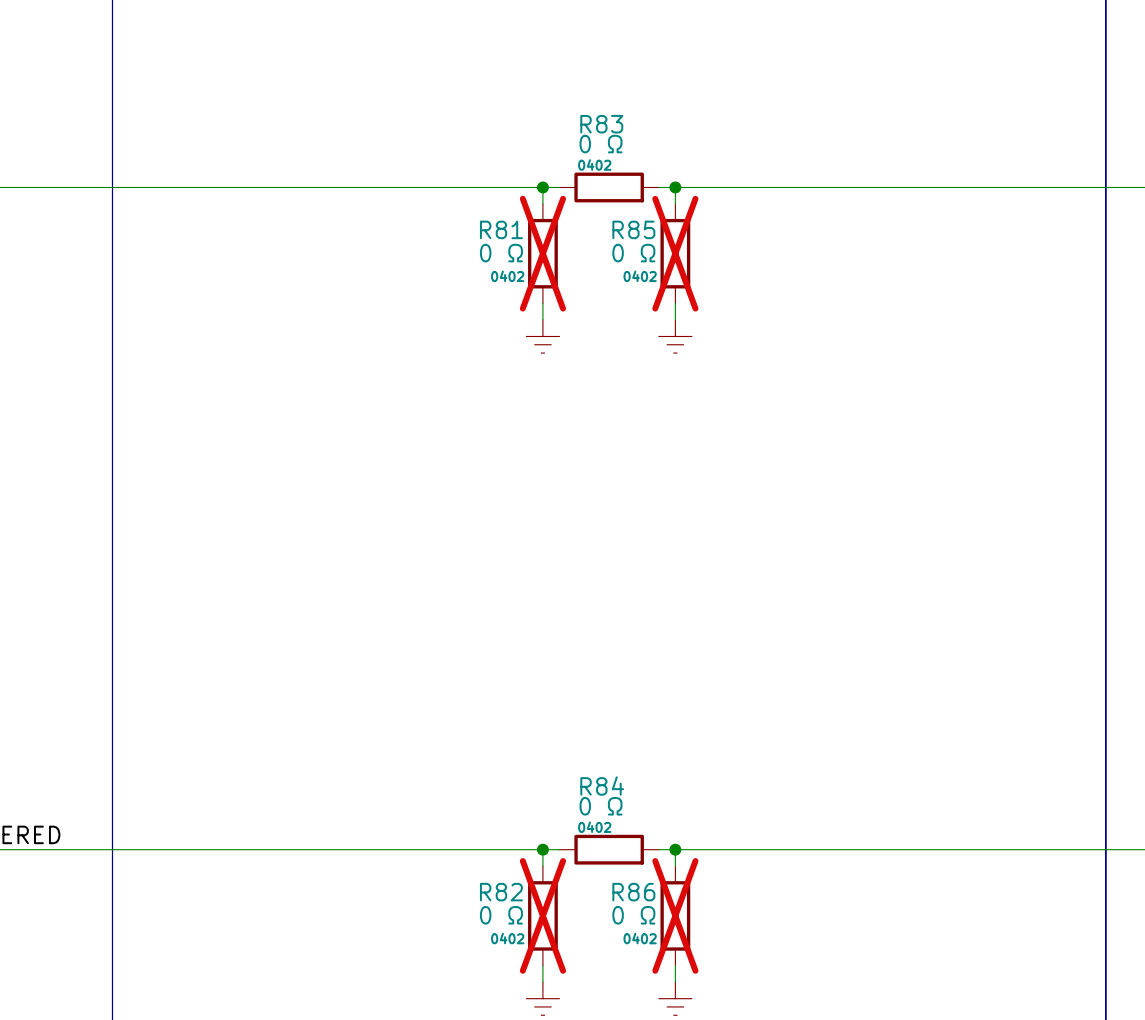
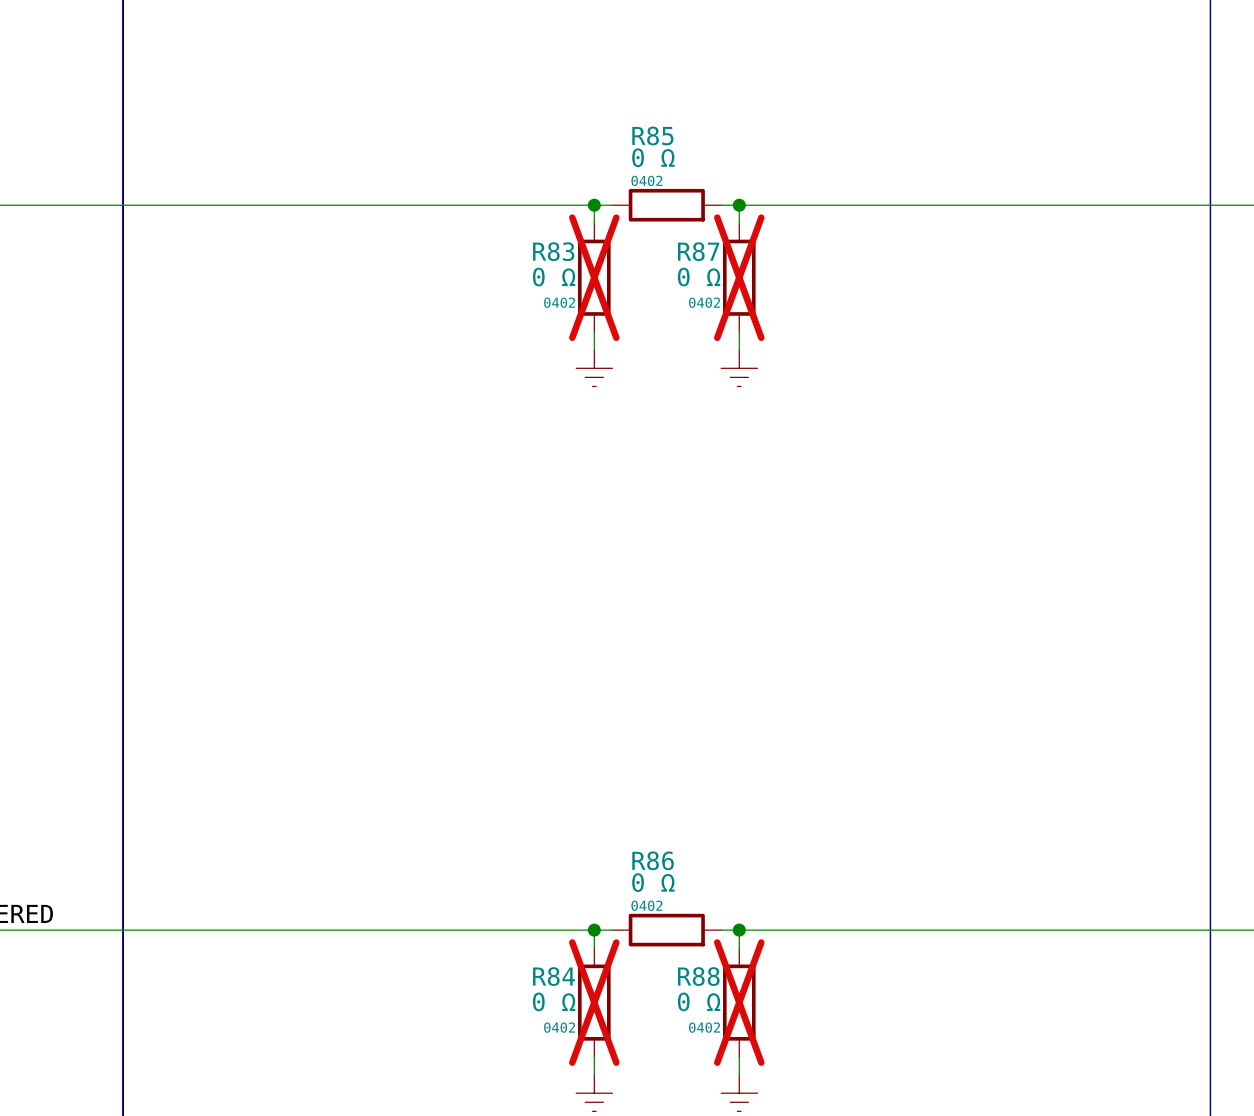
R83 name: R83 (601, 124) -> R85 (652, 135)
R81 name: R81 (501, 229) -> R83 (553, 251)
R85 name: R85 (633, 229) -> R87 (698, 251)
R84 name: R84 (602, 786) -> R86 (653, 860)
R82 name: R82 (501, 892) -> R84 (554, 976)
R86 name: R86 (633, 892) -> R88 (698, 976)

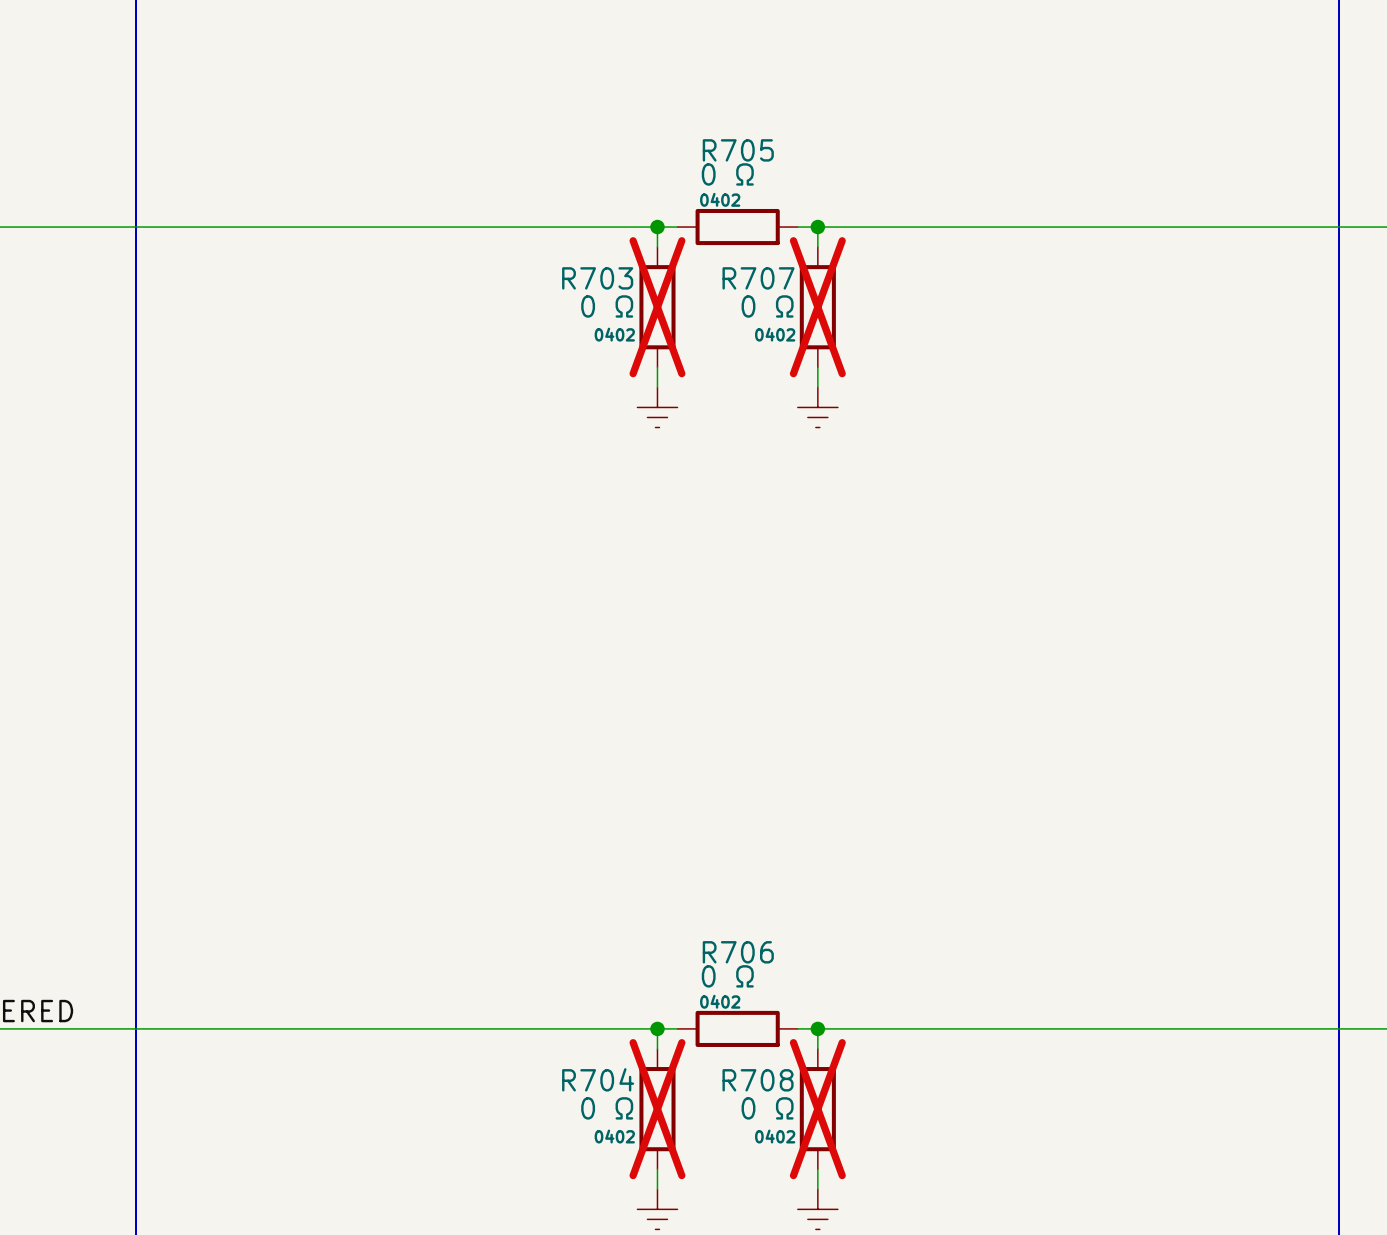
R85 name: R85 (652, 135) -> R705 (738, 150)
R83 name: R83 (553, 251) -> R703 (597, 278)
R87 name: R87 (698, 251) -> R707 (758, 278)
R86 name: R86 (653, 860) -> R706 (738, 952)
R84 name: R84 (554, 976) -> R704 (598, 1079)
R88 name: R88 (698, 976) -> R708 (758, 1080)

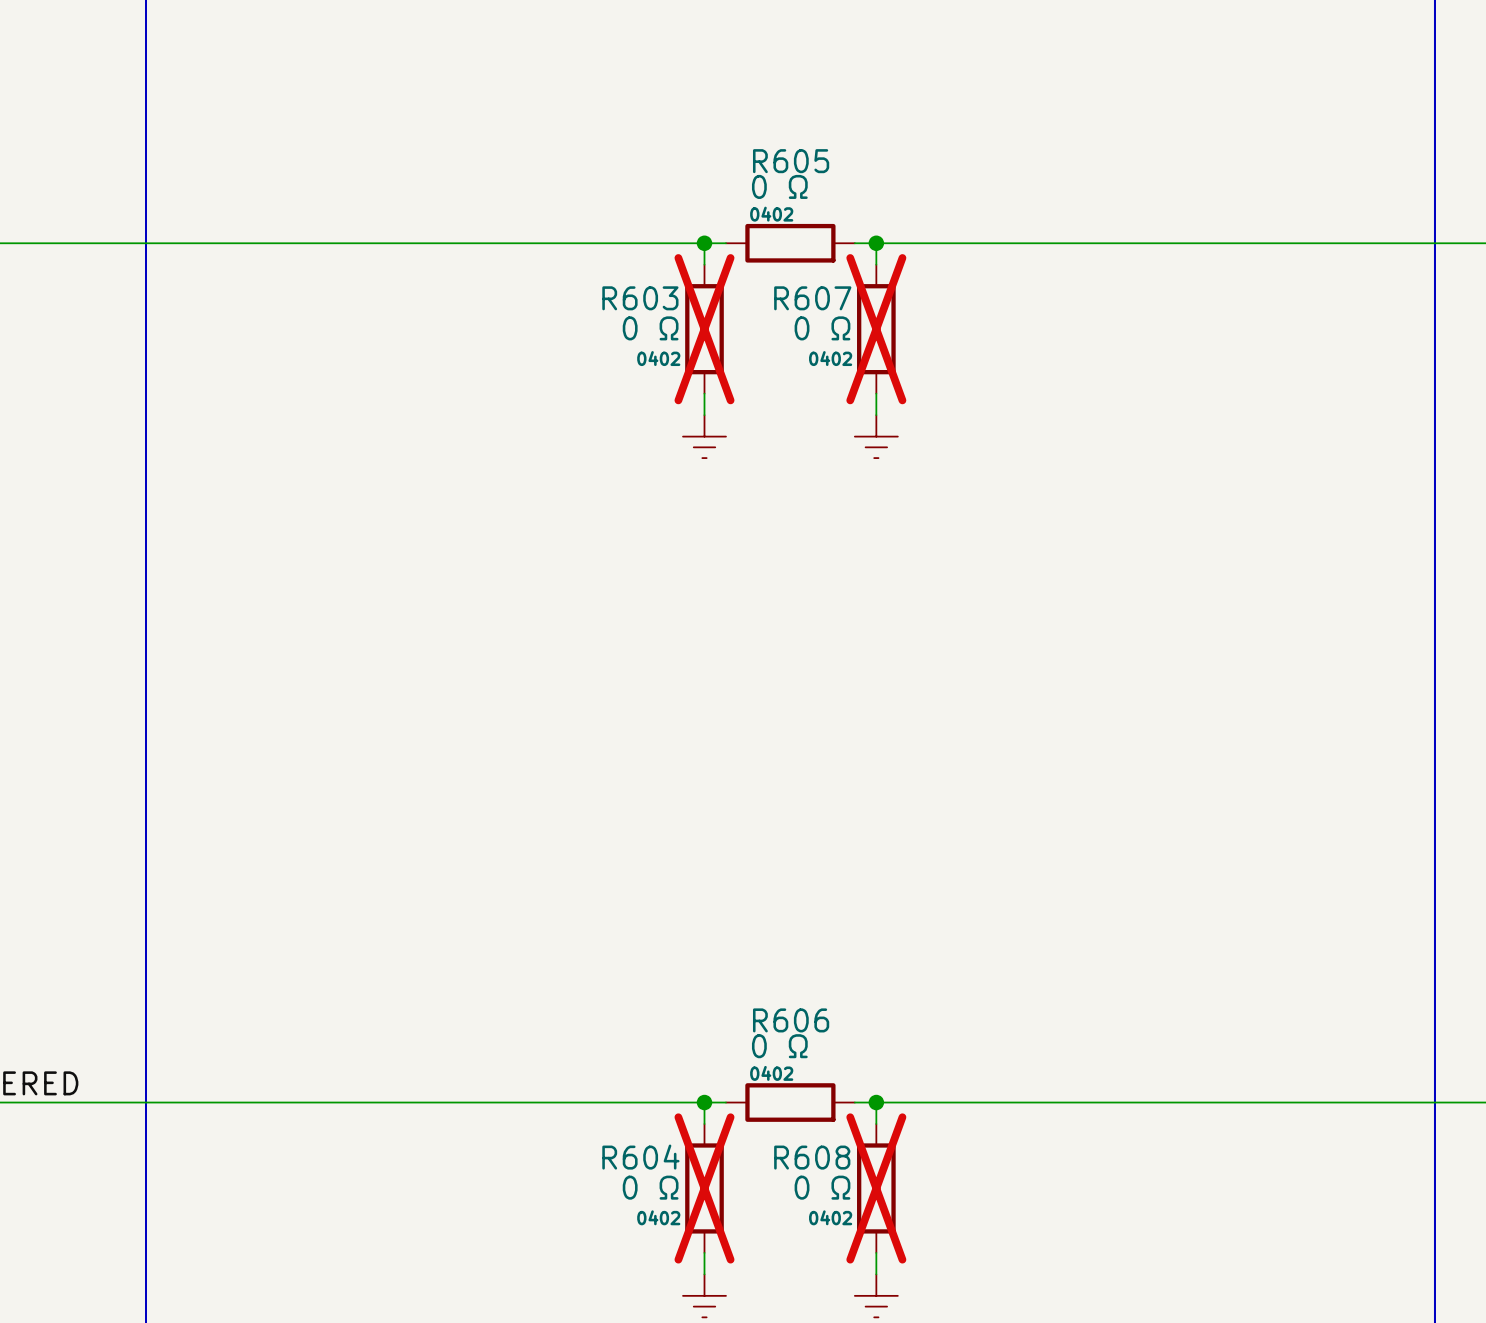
R705 name: R705 (738, 150) -> R605 (791, 161)
R703 name: R703 (597, 278) -> R603 (640, 298)
R707 name: R707 (758, 278) -> R607 (812, 298)
R706 name: R706 (738, 952) -> R606 (791, 1020)
R704 name: R704 (598, 1079) -> R604 (640, 1157)
R708 name: R708 (758, 1080) -> R608 (812, 1157)

